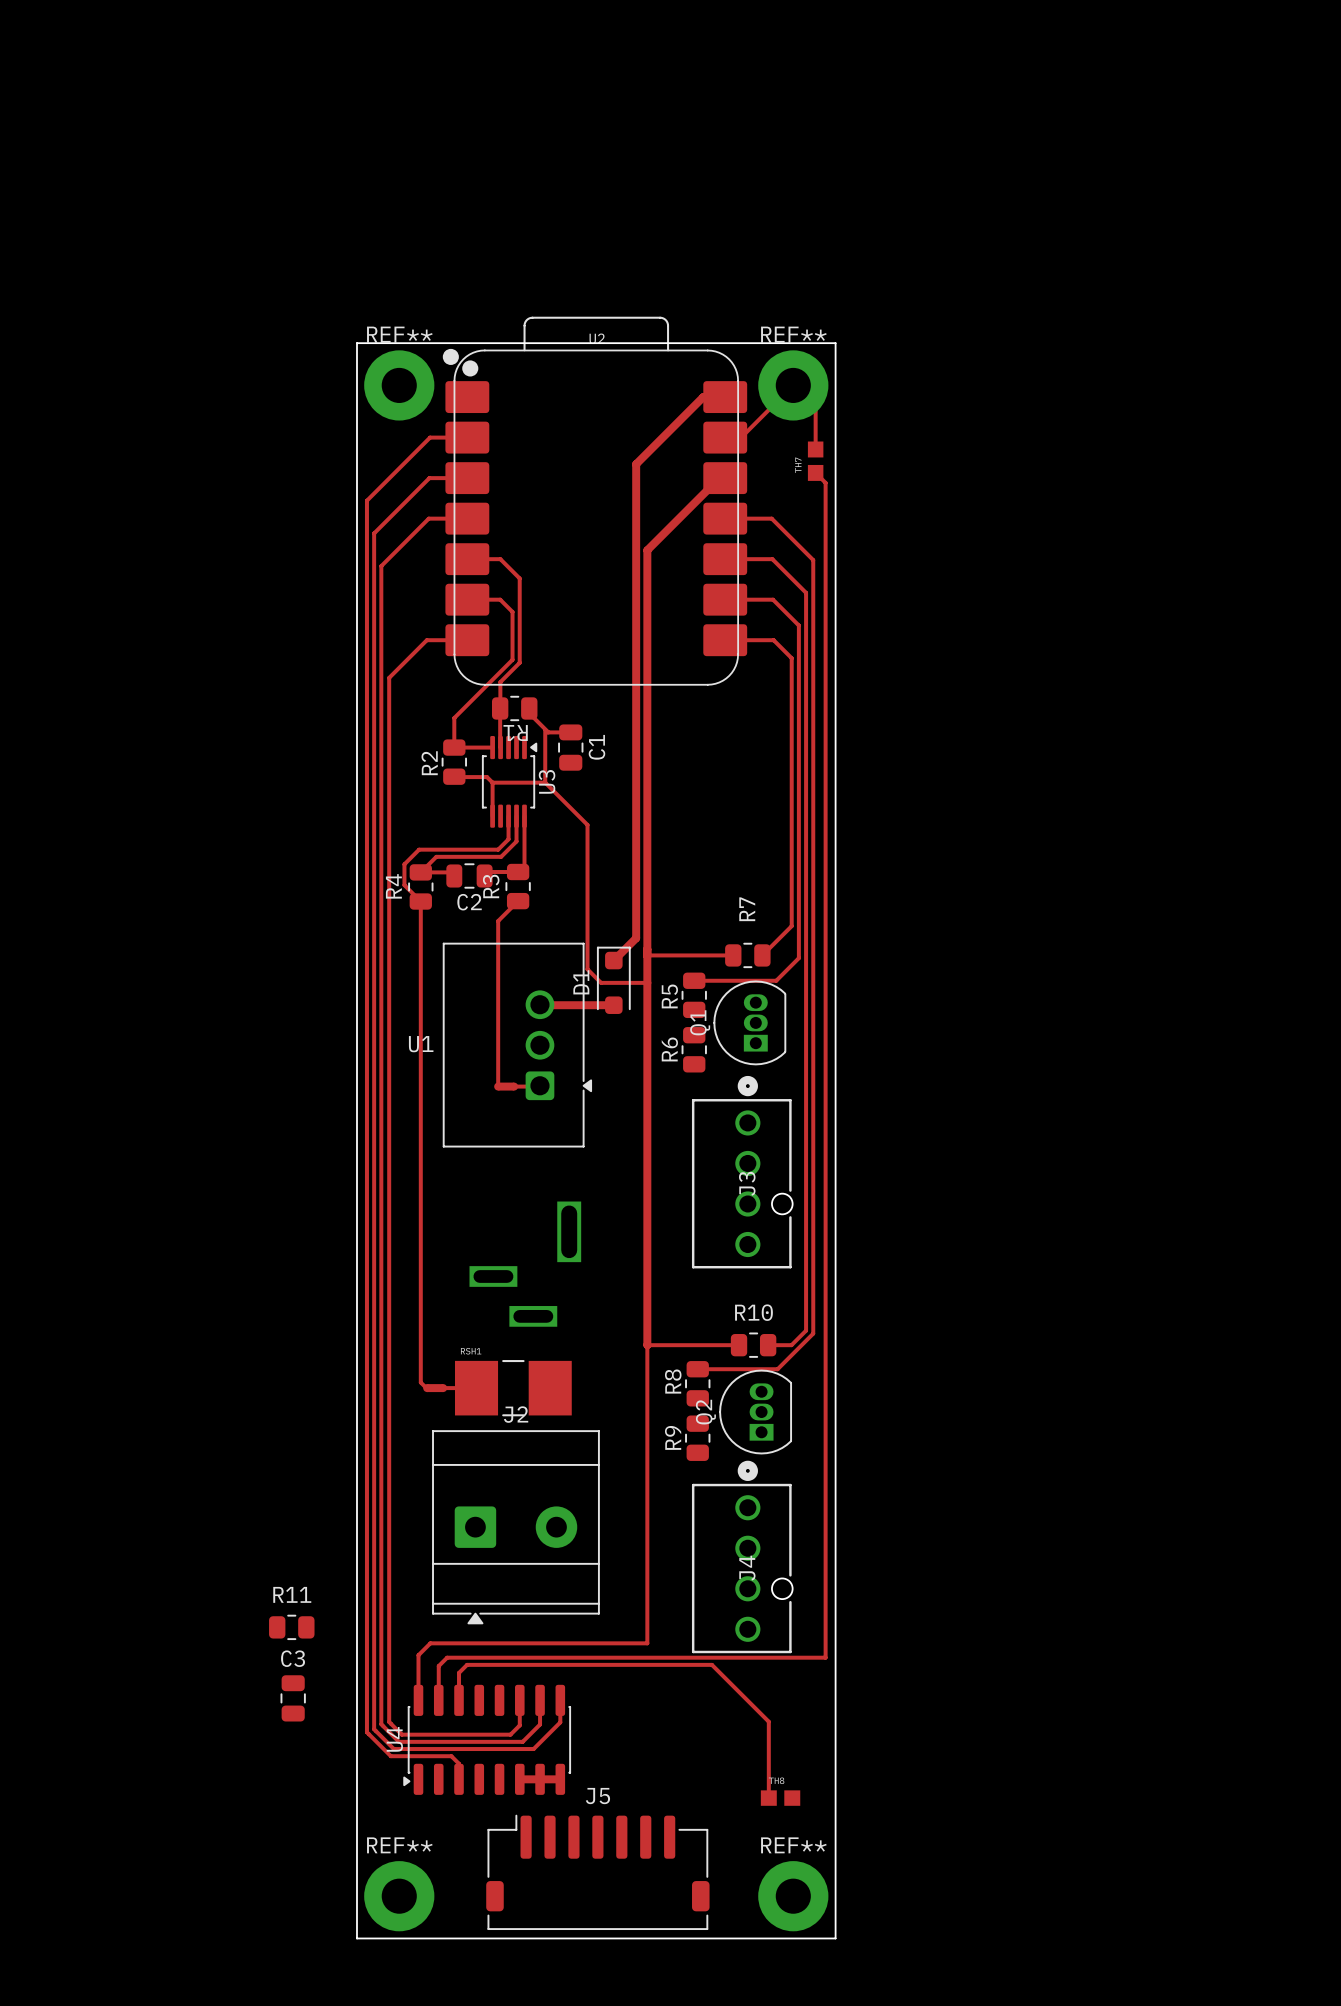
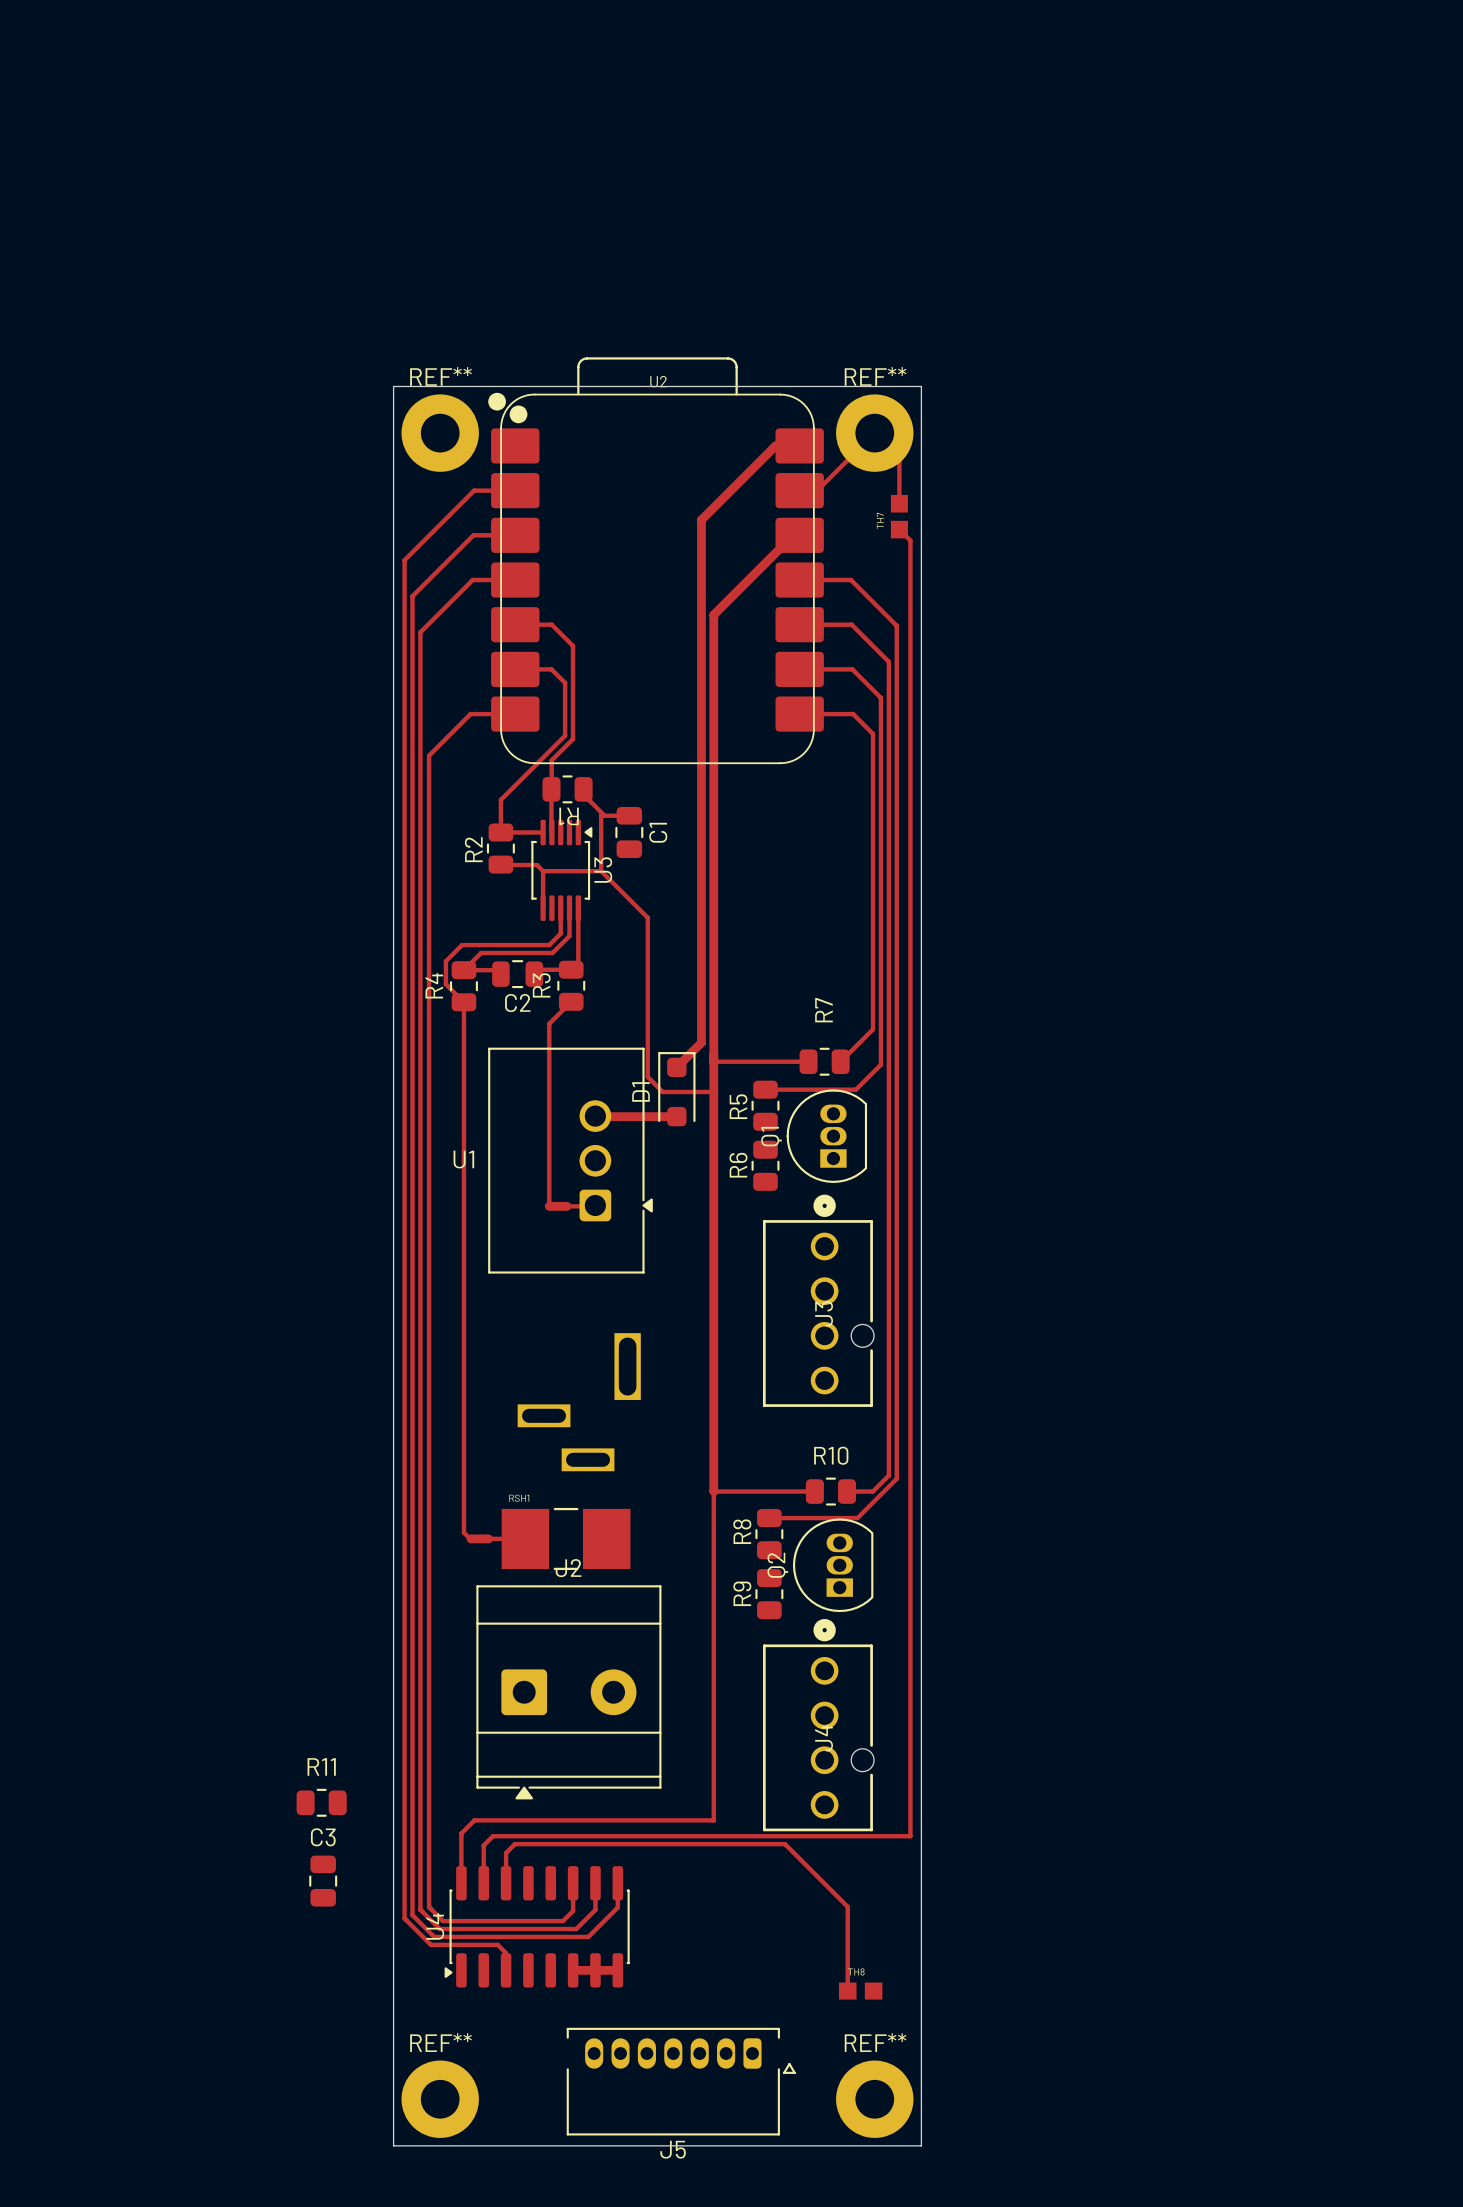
J5 name position: J5 (597, 1796) -> J5 (673, 2149)
J5 footprint: [486, 1814, 710, 1931] -> [566, 2027, 796, 2136]

